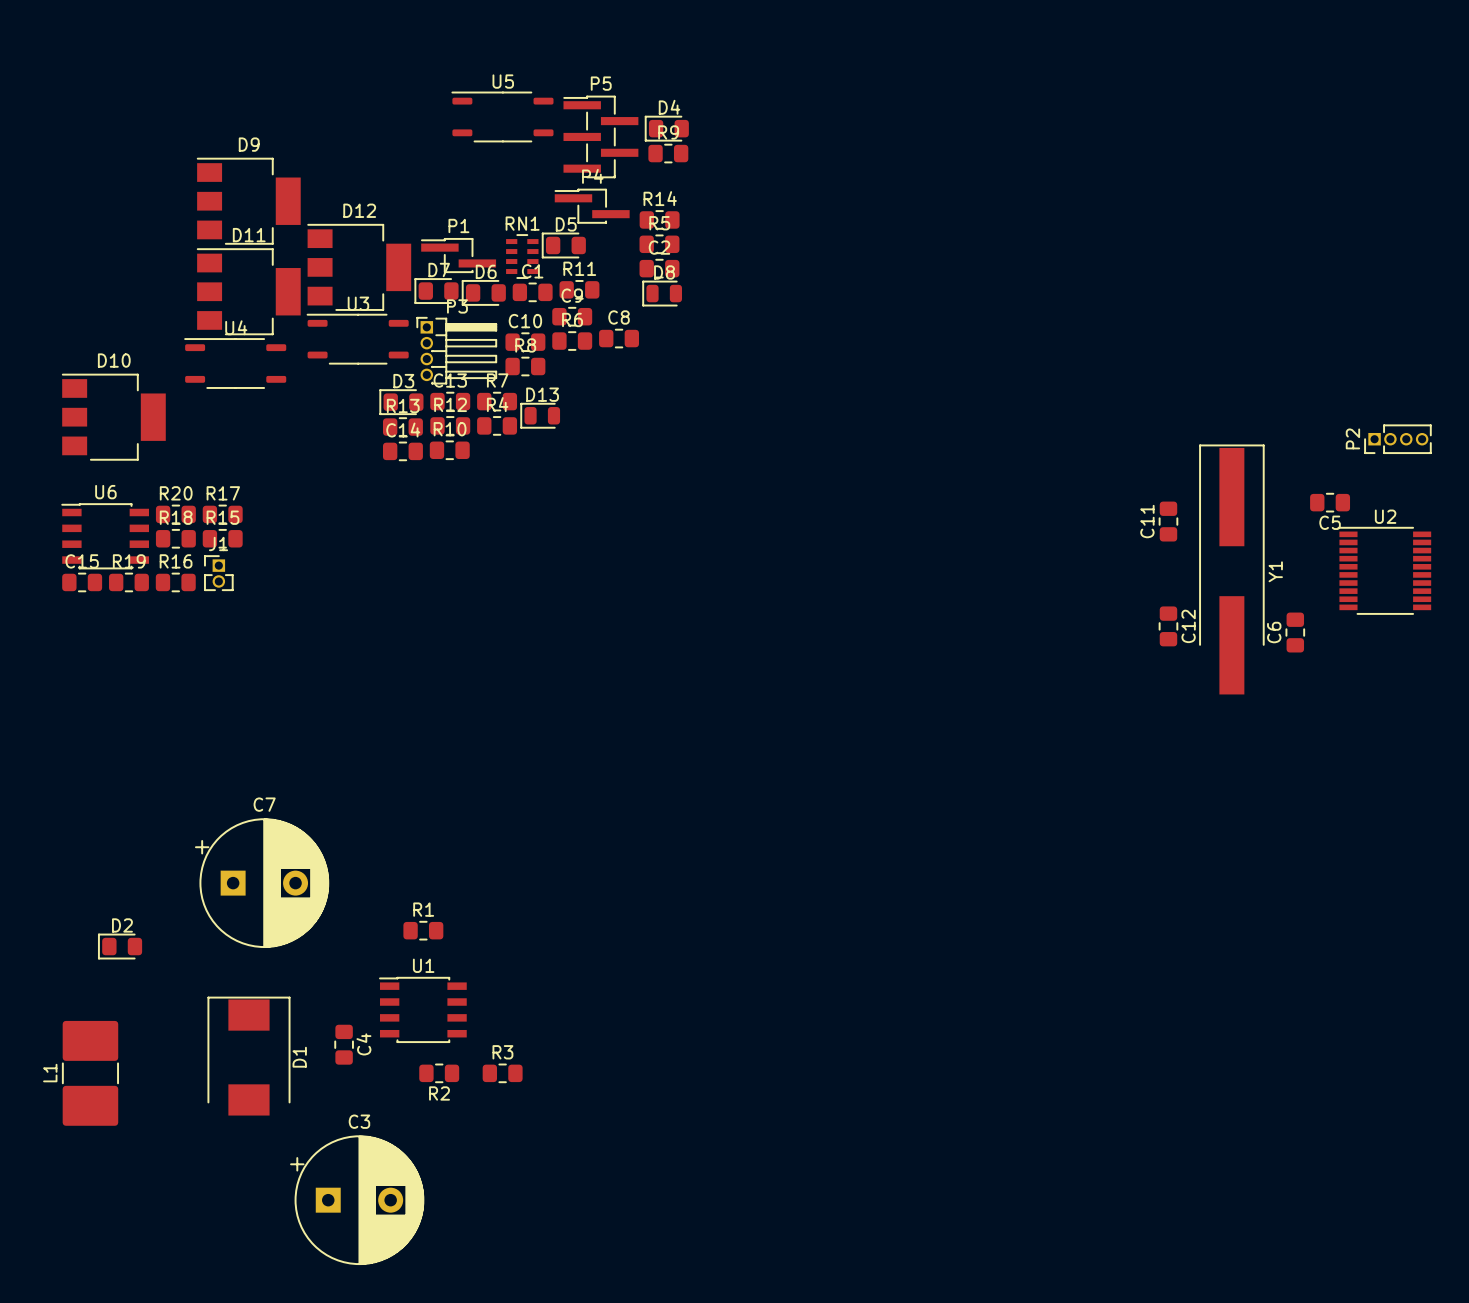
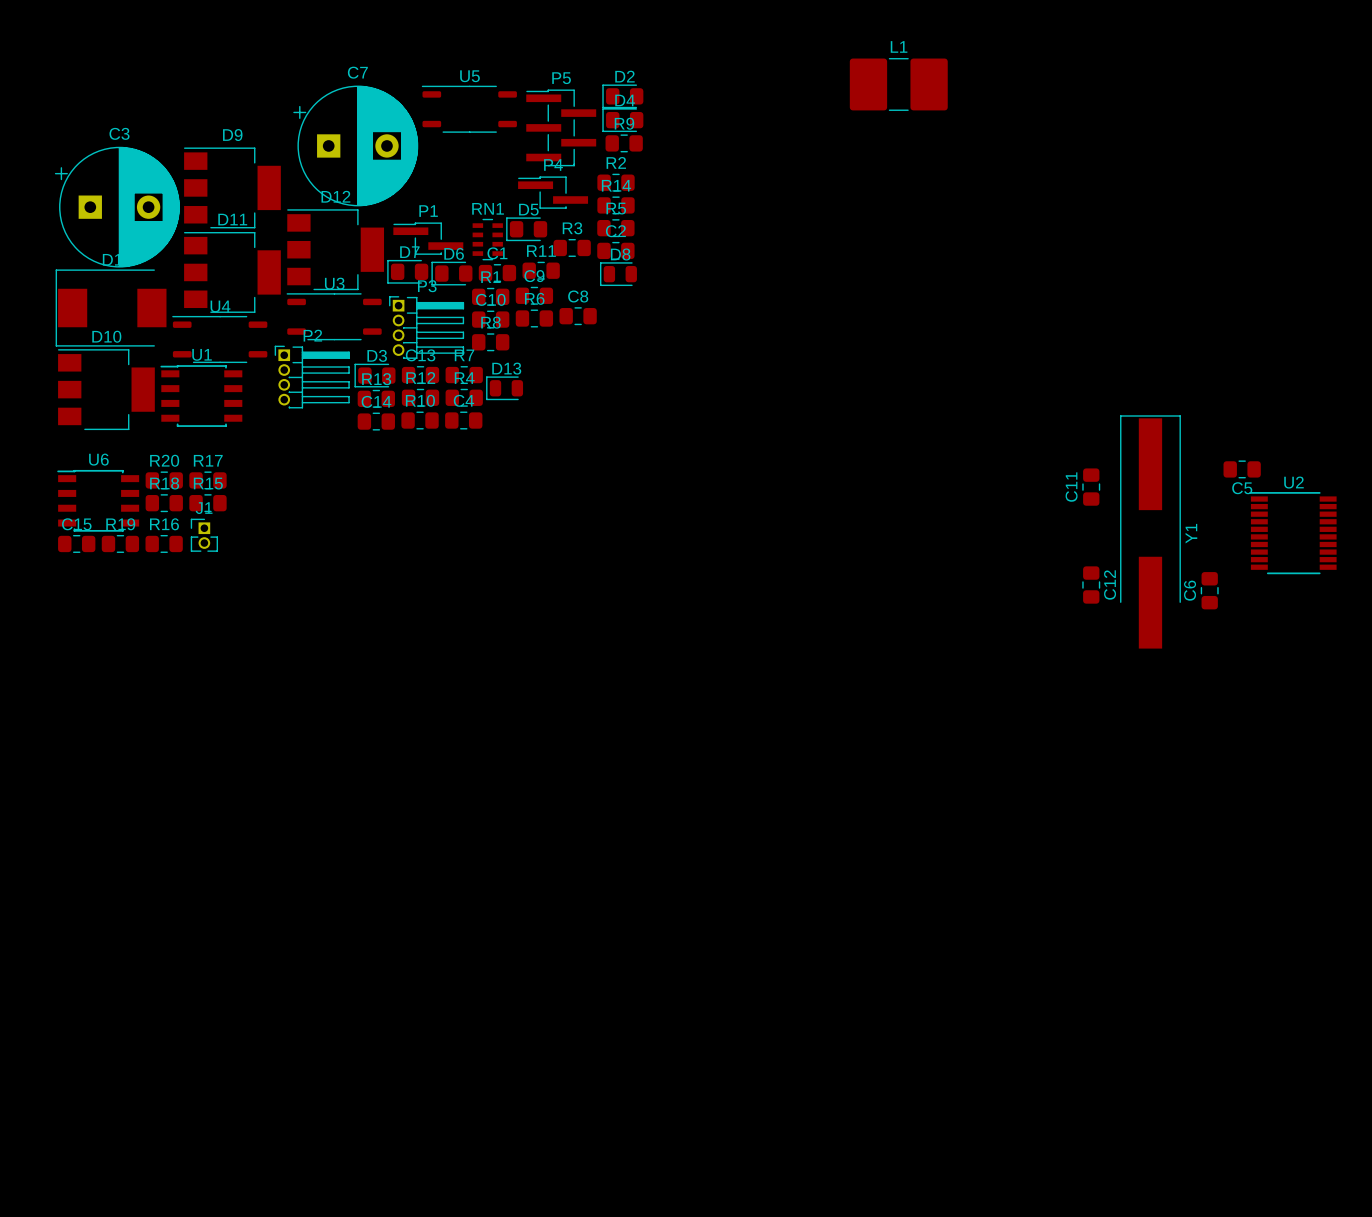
P2 footprint: [1364, 424, 1432, 454] -> [274, 345, 350, 409]
P2 name position: P2 (1352, 438) -> P2 (312, 335)
C7 position: (262, 883) -> (355, 145)
R1 position: (423, 930) -> (490, 296)
D2 position: (120, 946) -> (622, 96)
U1 position: (422, 1009) -> (201, 396)
C4 rotation: 0° (344, 1044) -> 90° clockwise (463, 420)
C4 position: (344, 1044) -> (463, 420)
C4 name position: C4 (363, 1044) -> C4 (463, 400)
D1 rotation: 0° (248, 1056) -> 90° counterclockwise (111, 308)
D1 position: (248, 1056) -> (111, 308)
L1 rotation: 0° (90, 1073) -> 90° clockwise (898, 84)
L1 position: (90, 1073) -> (898, 84)
R2 position: (439, 1073) -> (616, 182)
R3 position: (502, 1073) -> (572, 247)
R2 name position: R2 (439, 1093) -> R2 (616, 162)
C3 position: (357, 1200) -> (117, 207)

